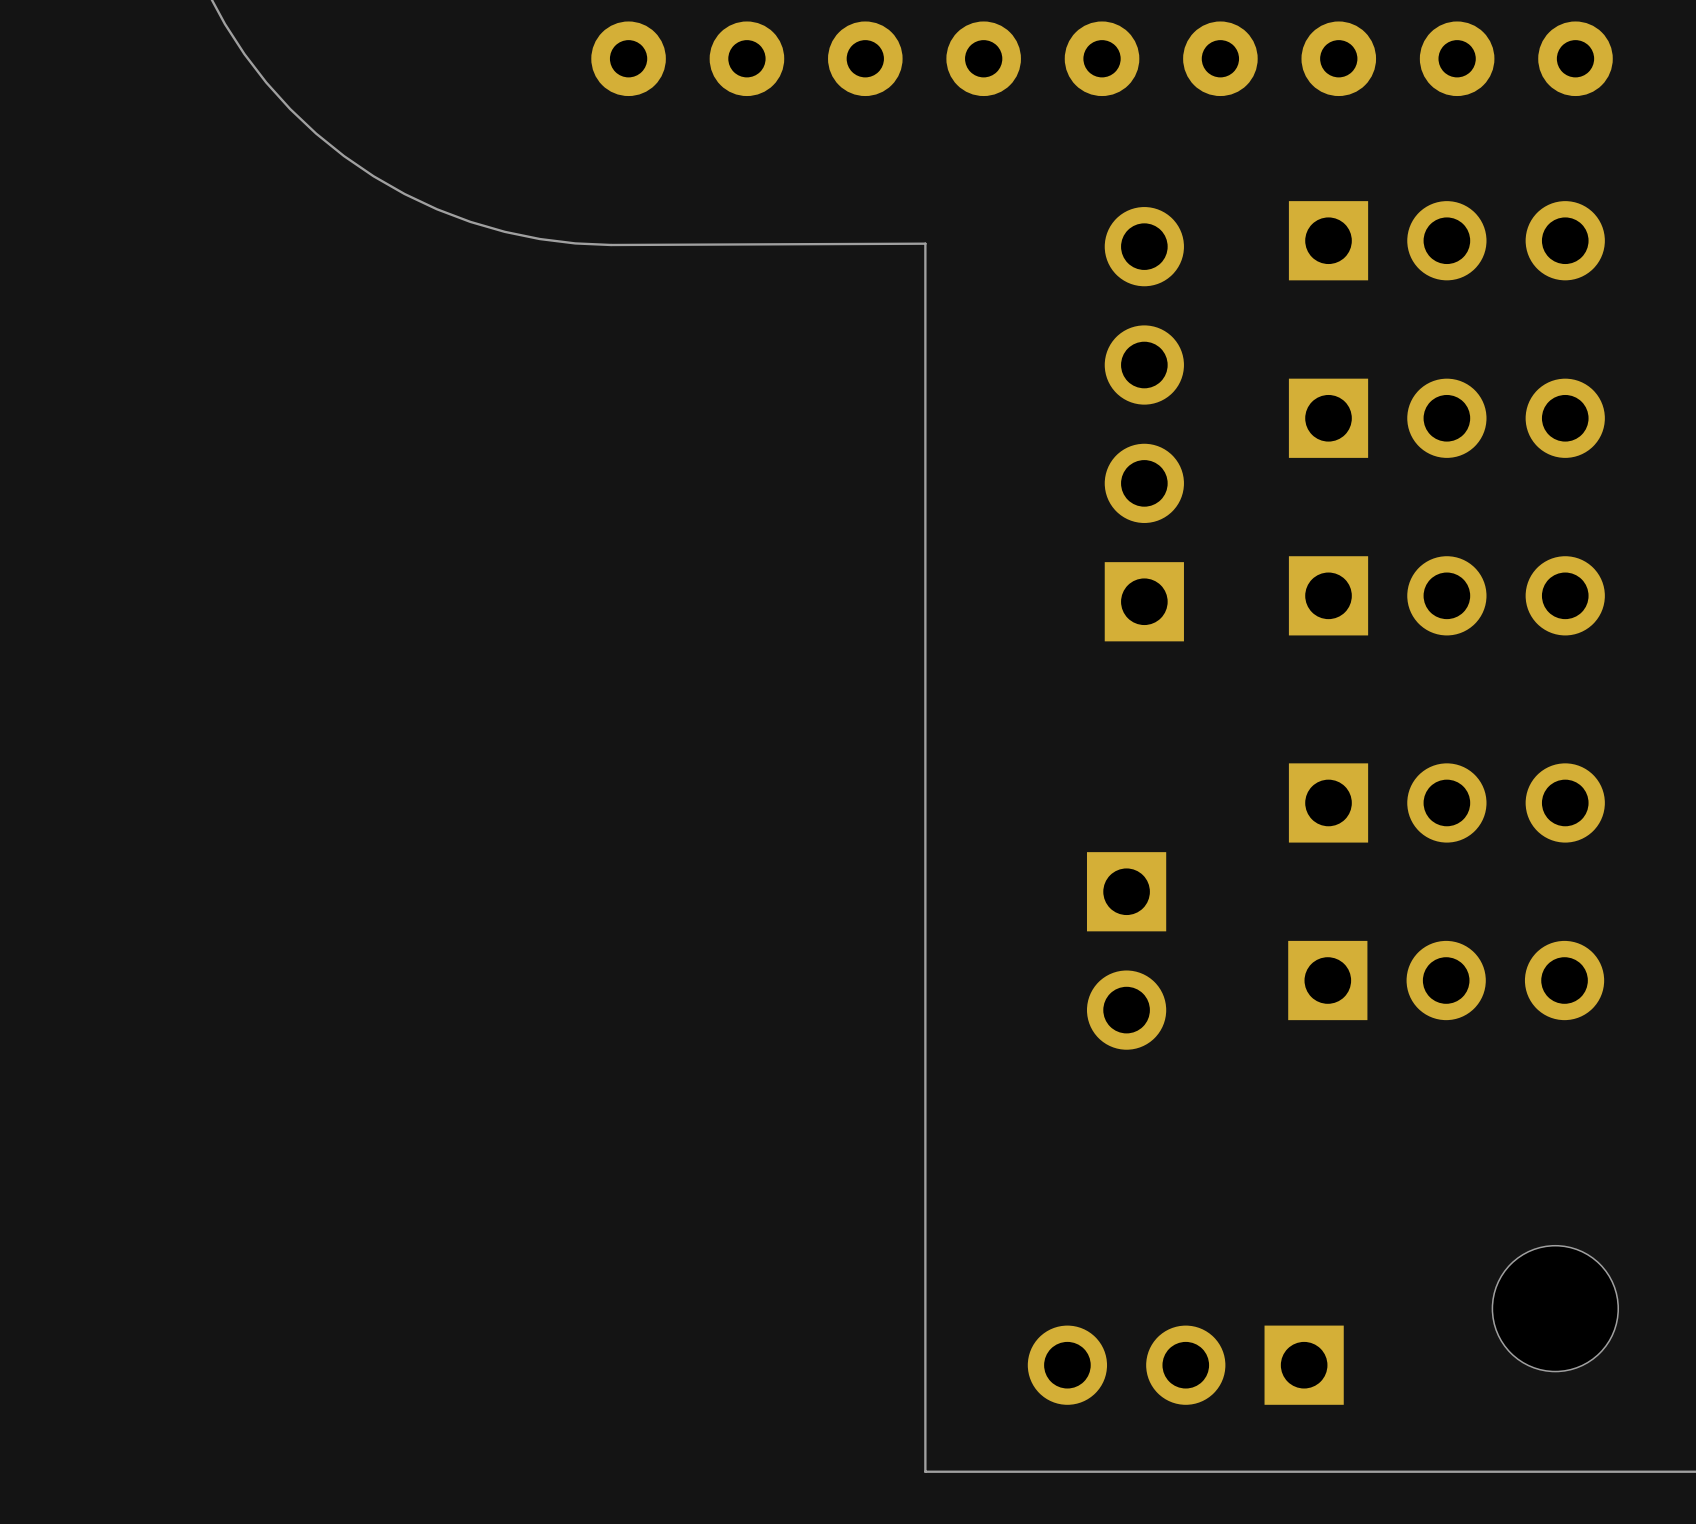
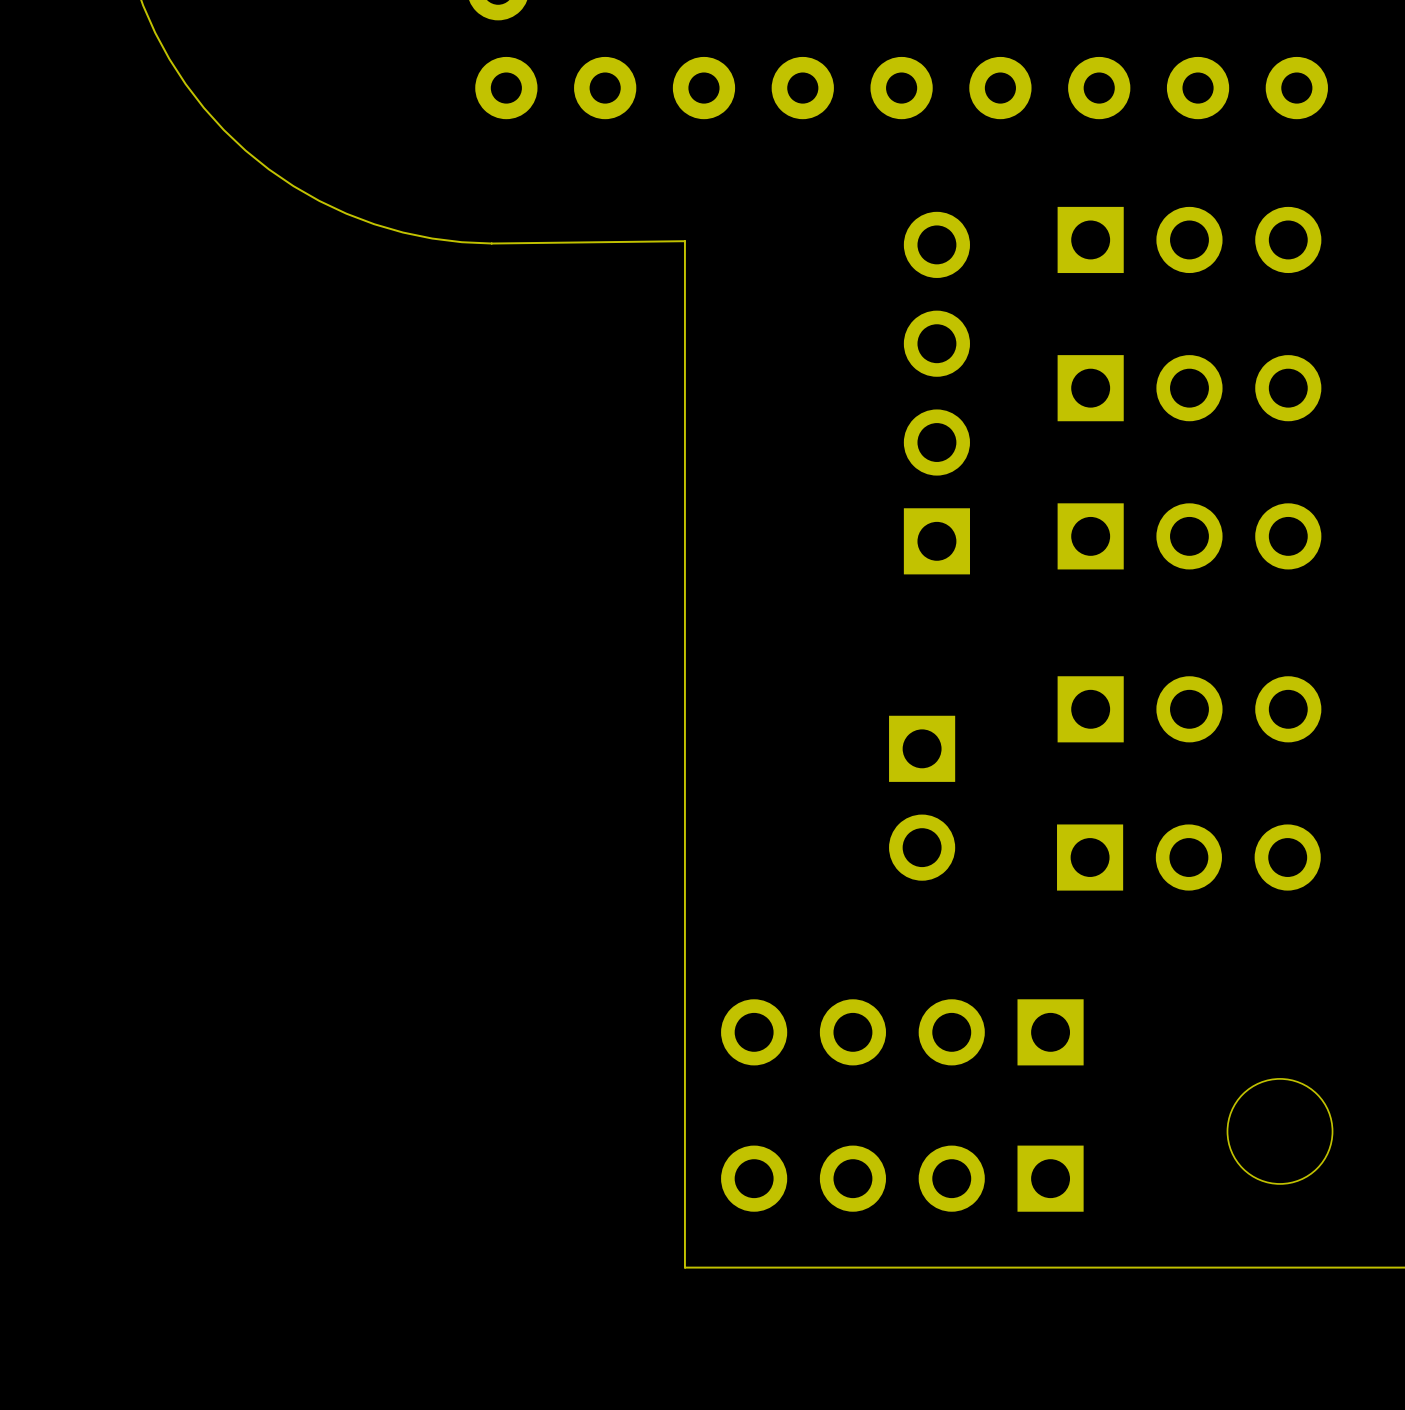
board edge: (611, 244) (925, 243) (925, 1471) -> (491, 243) (684, 241) (684, 1267) (754, 1267)
part position: (1126, 950) -> (922, 798)
part: none -> (902, 1032)
part: none -> (902, 1178)
part: (1185, 1365) -> none

